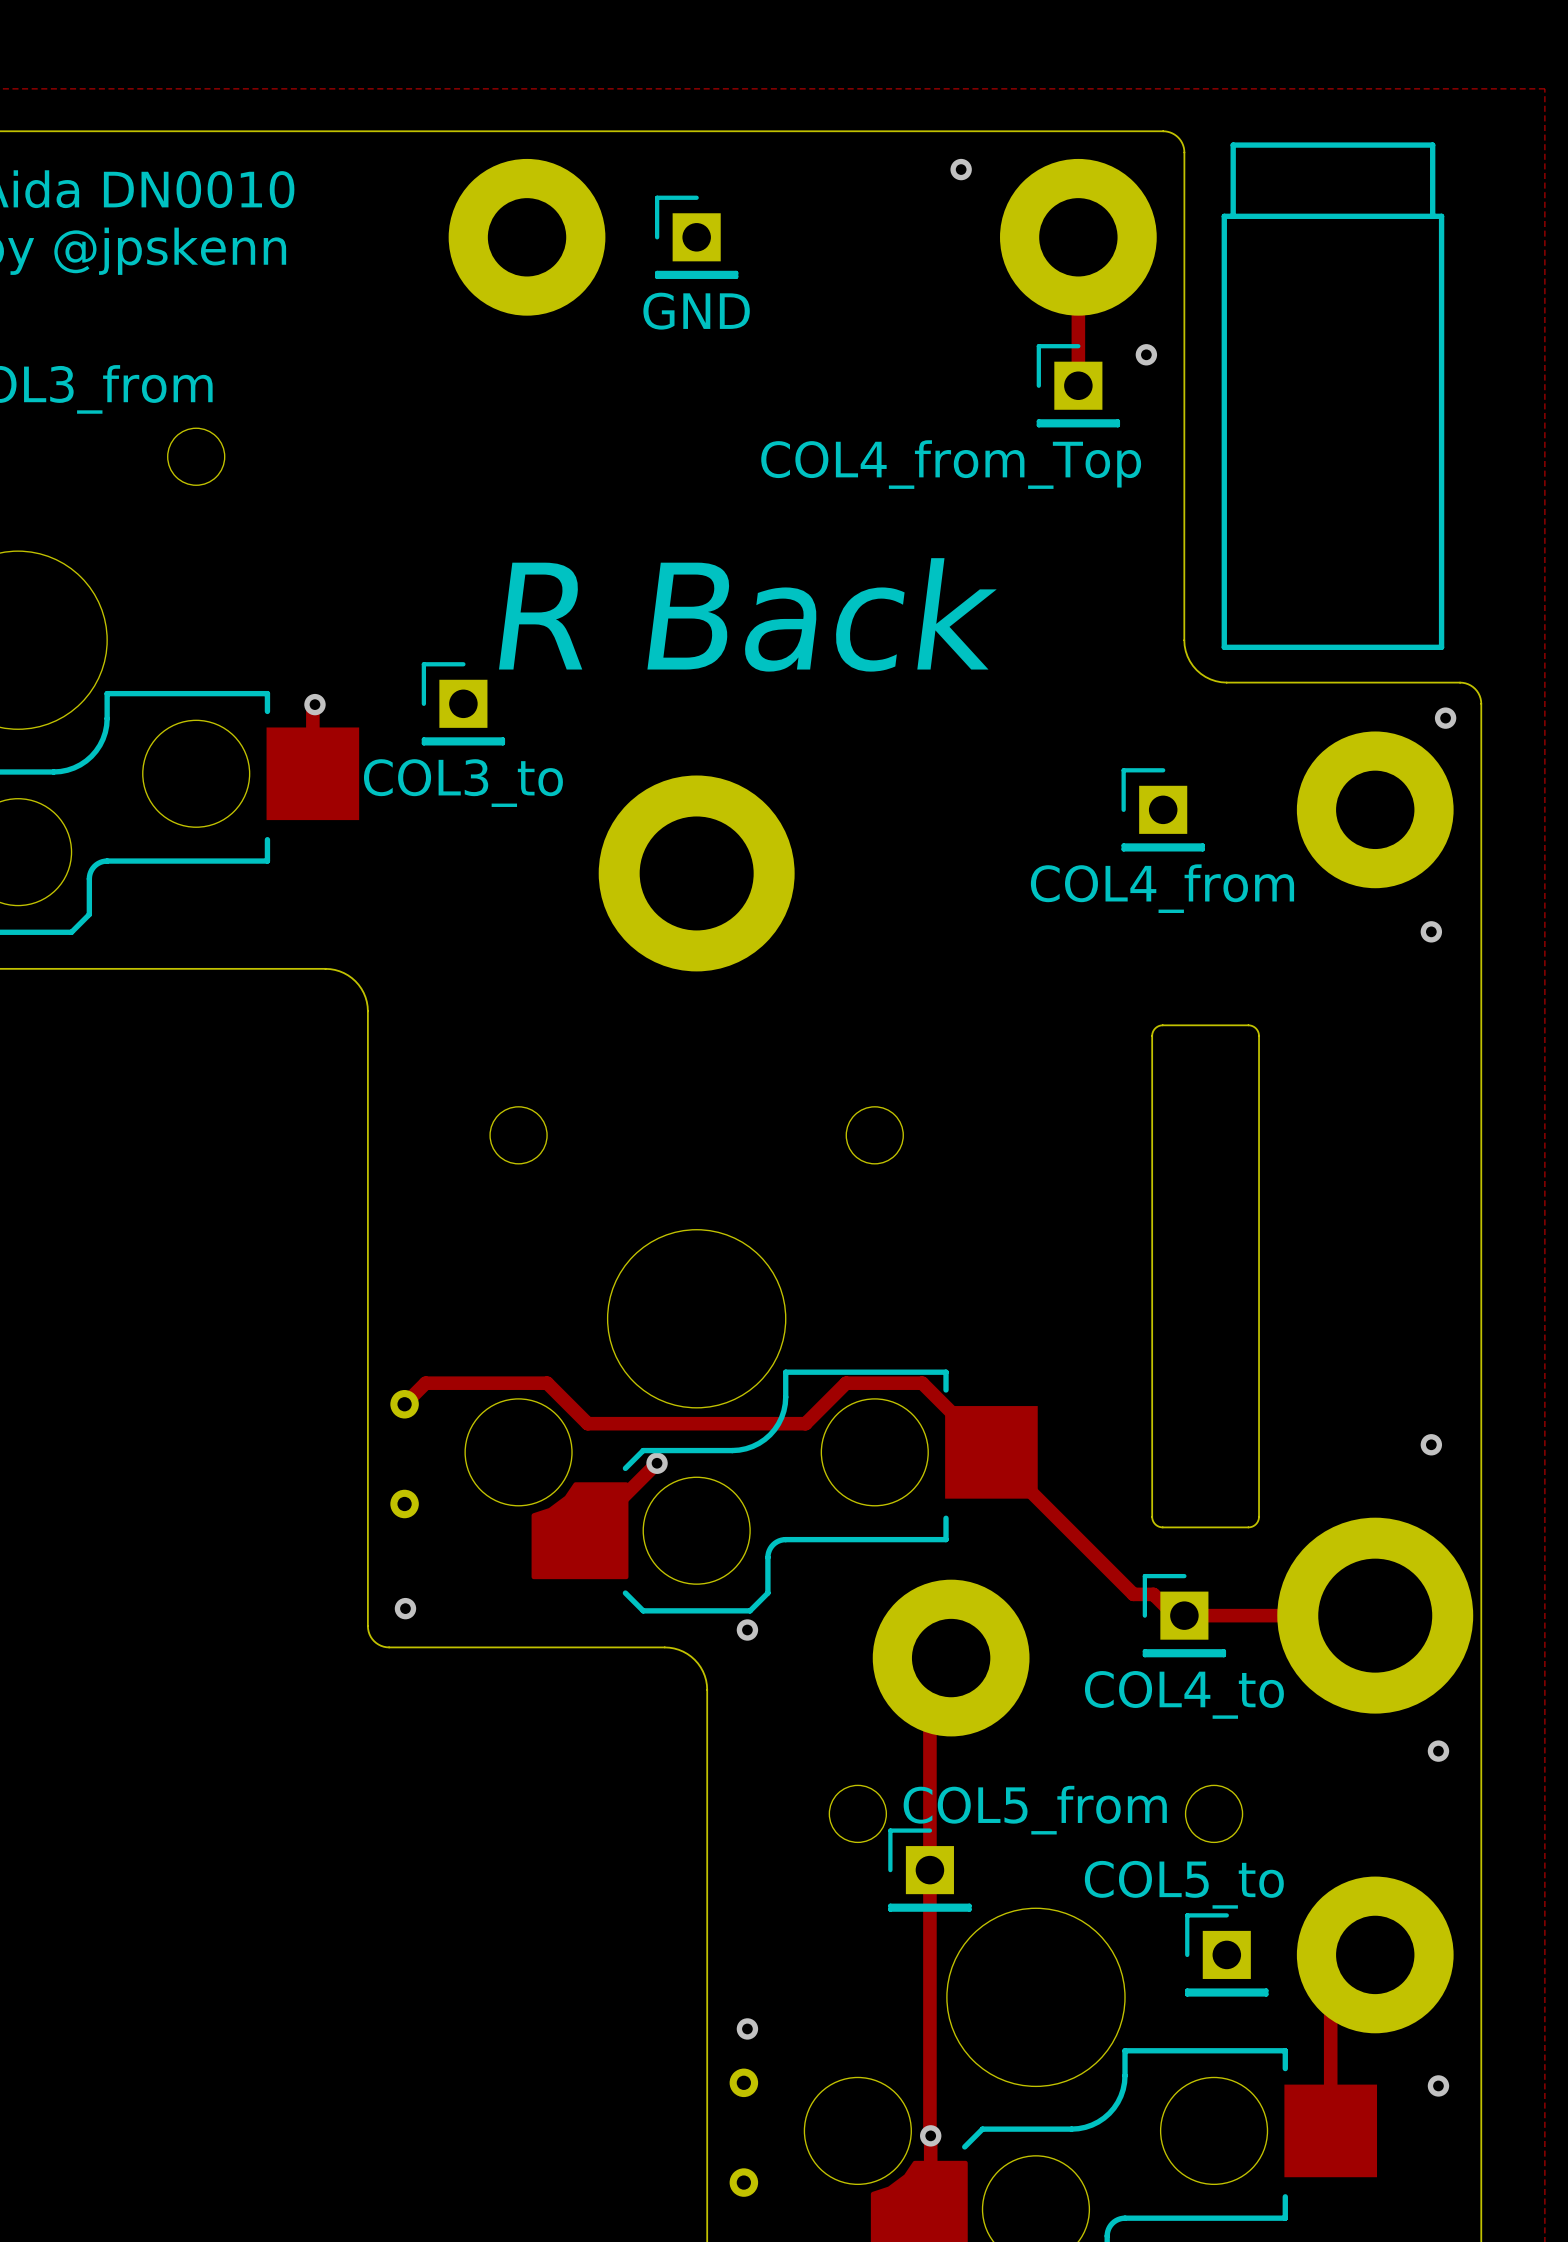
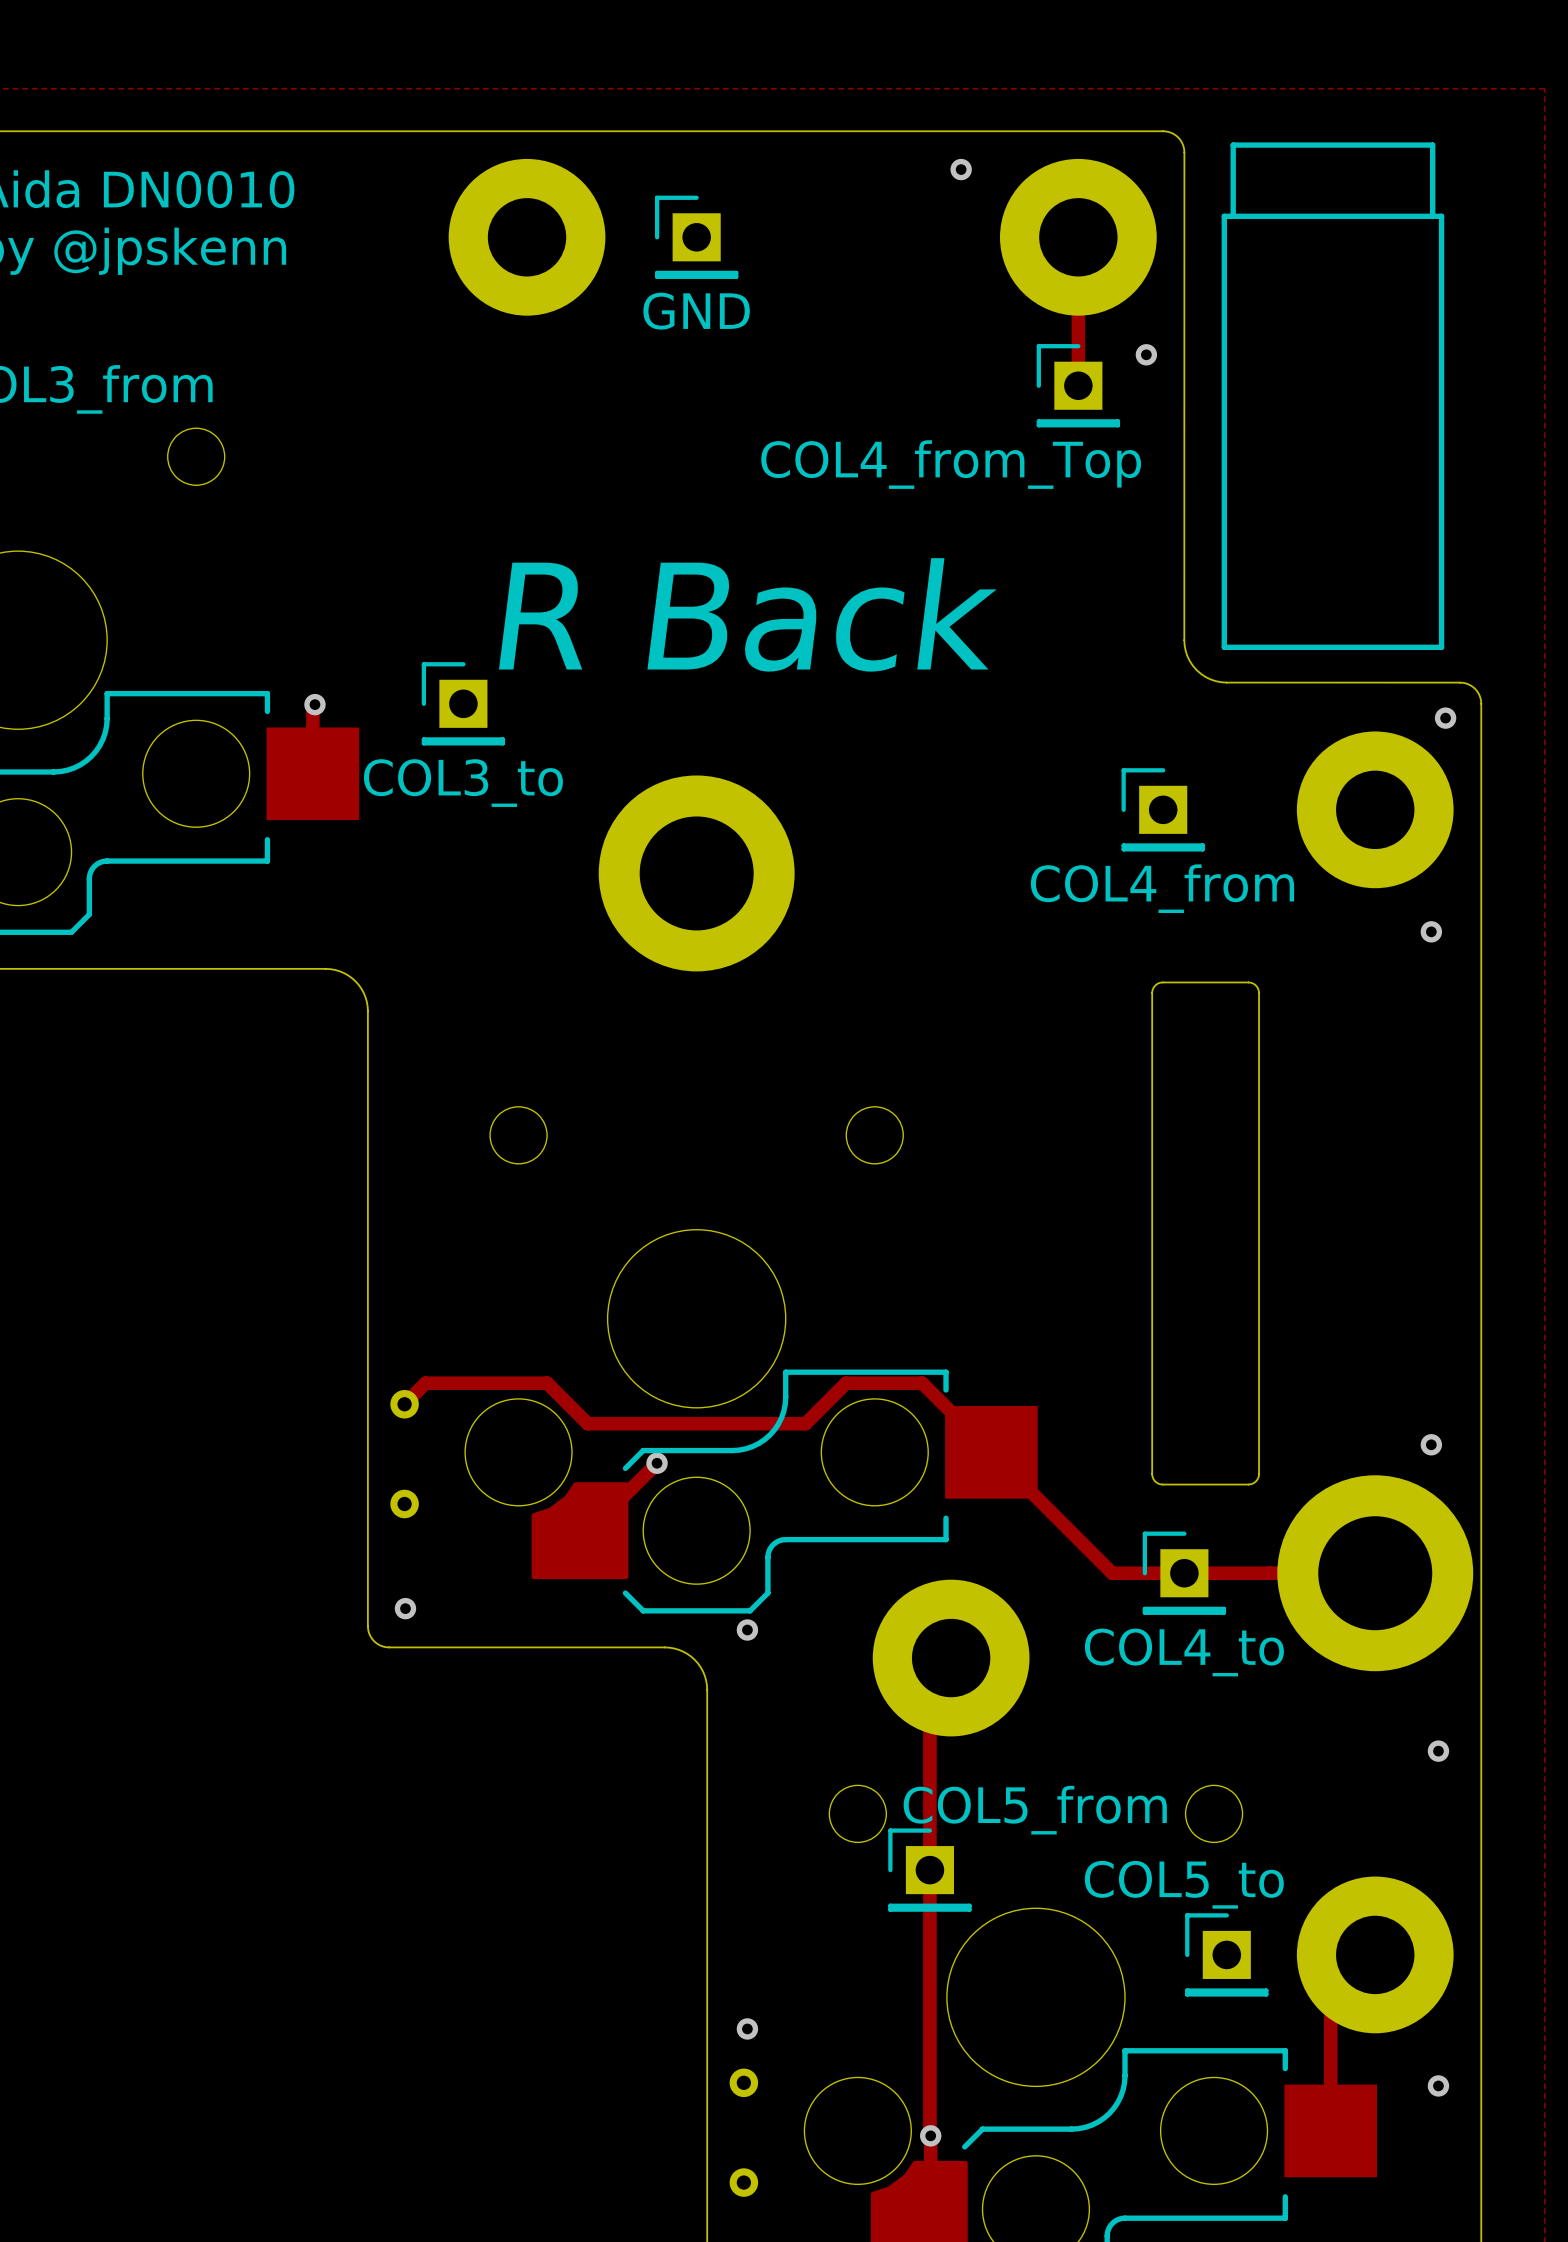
board edge: (1152, 1035) (1155, 1028) (1162, 1025) (1249, 1025) (1255, 1028) (1259, 1035) -> (1152, 1035) (1152, 991) (1155, 985) (1162, 982) (1253, 983) (1258, 991) (1259, 1035)
board edge: (1152, 1473) (1152, 1518) (1156, 1525) (1162, 1527) (1253, 1525) (1258, 1518) (1259, 1473) -> (1152, 1473) (1155, 1481) (1162, 1484) (1249, 1484) (1256, 1480) (1259, 1473)
track: (1112, 1573) (1133, 1594) (1153, 1594) (1174, 1615) (1375, 1615) -> (1112, 1573) (1375, 1573)
part position: (1184, 1615) -> (1184, 1573)
part position: (1375, 1615) -> (1375, 1573)

